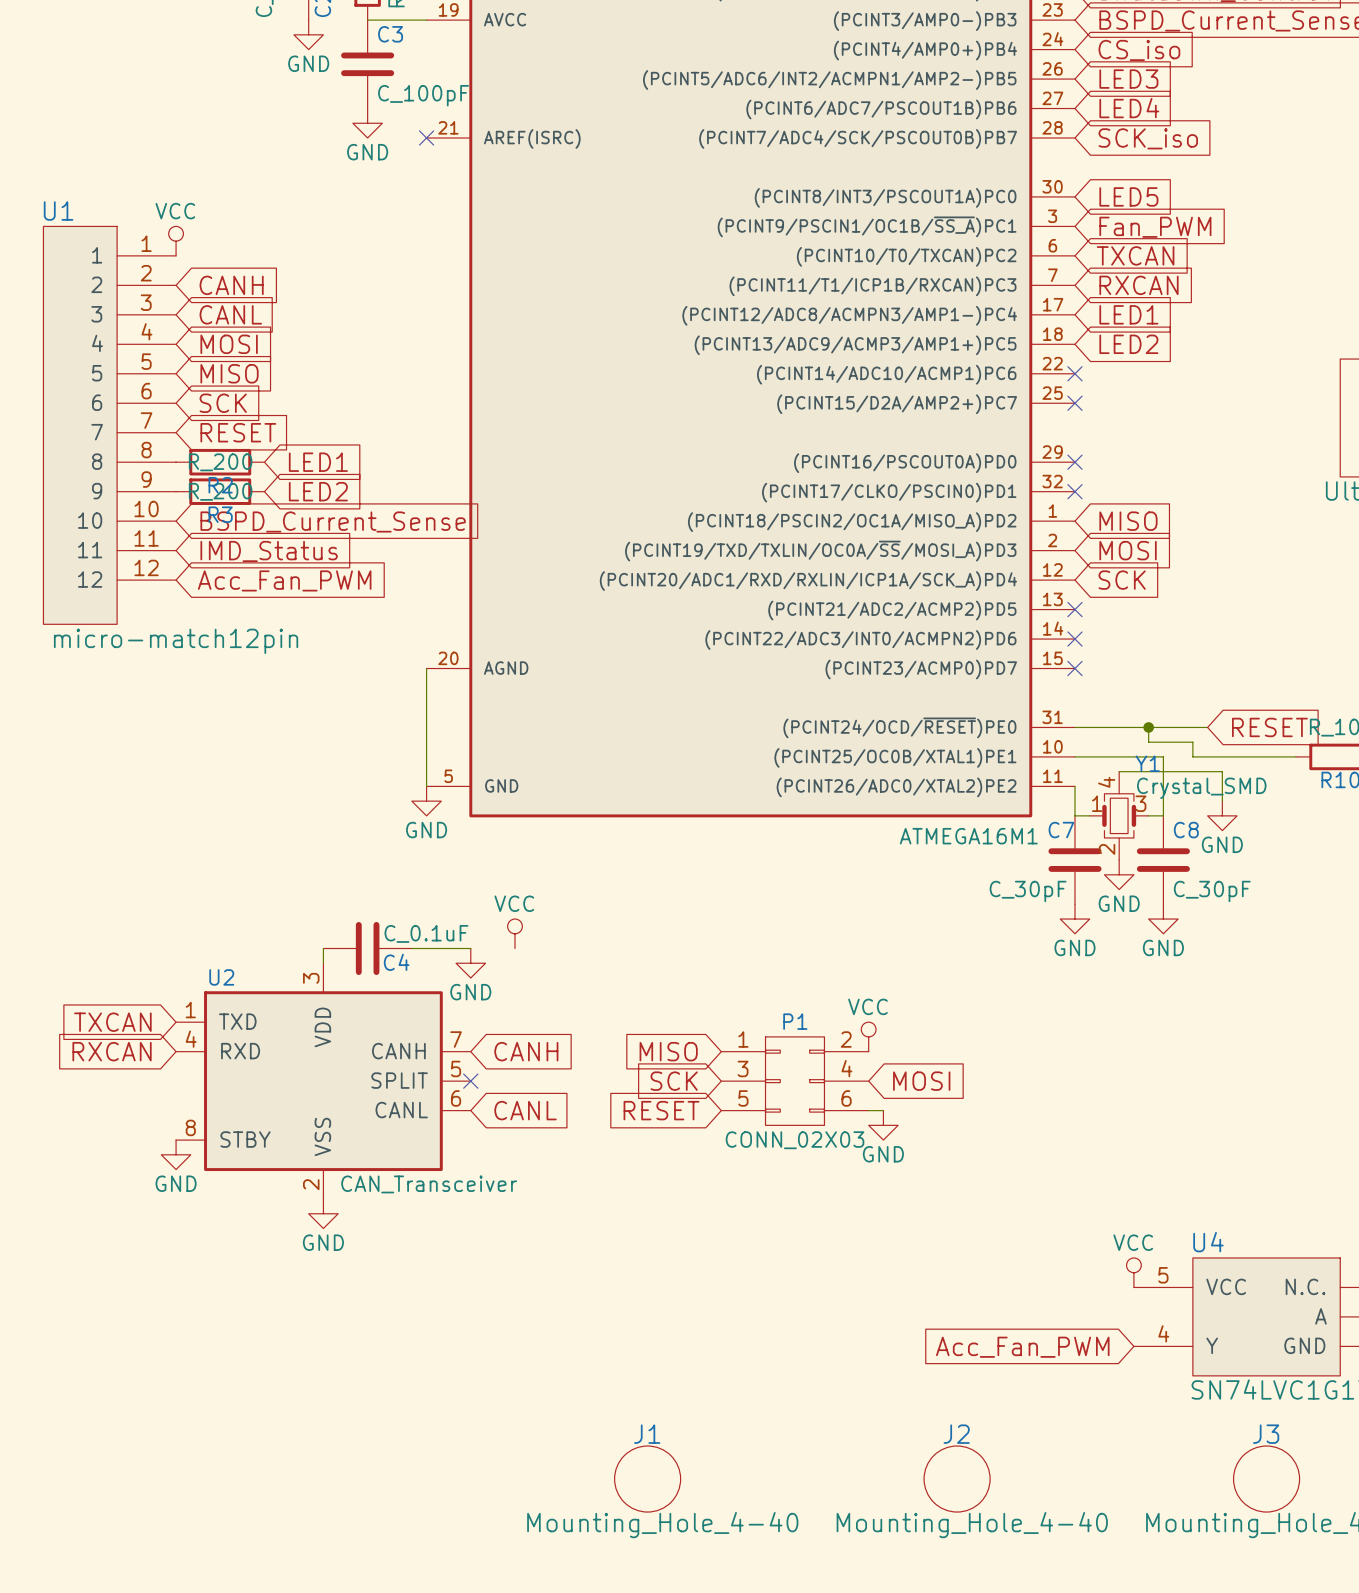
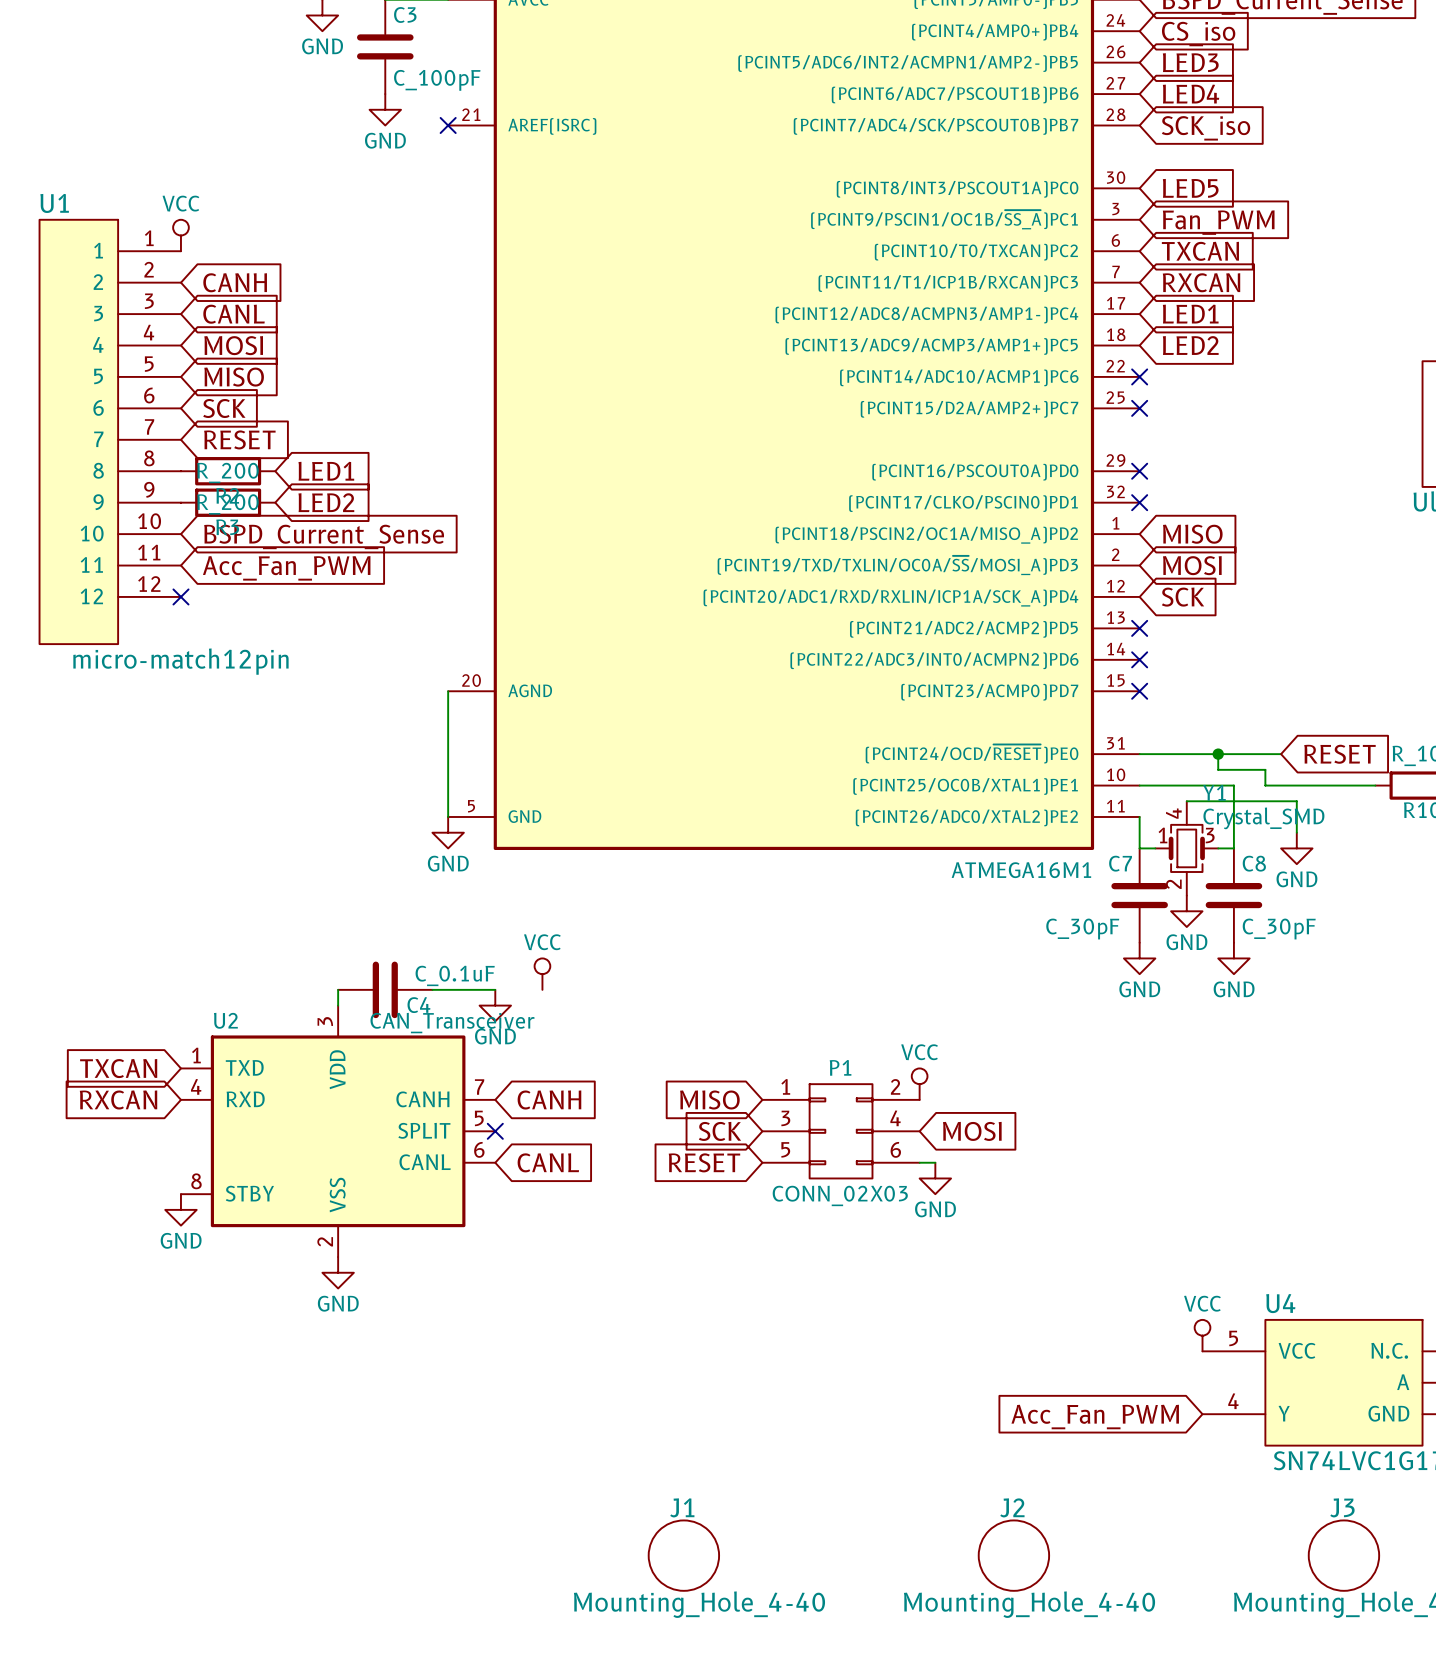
global label: IMD_Status (269, 551) -> Acc_Fan_PWM (286, 568)
no-connect mark: none -> (180, 596)
global label: Acc_Fan_PWM (284, 580) -> none
U2 value position: CAN_Transceiver (429, 1184) -> CAN_Transceiver (452, 1023)

